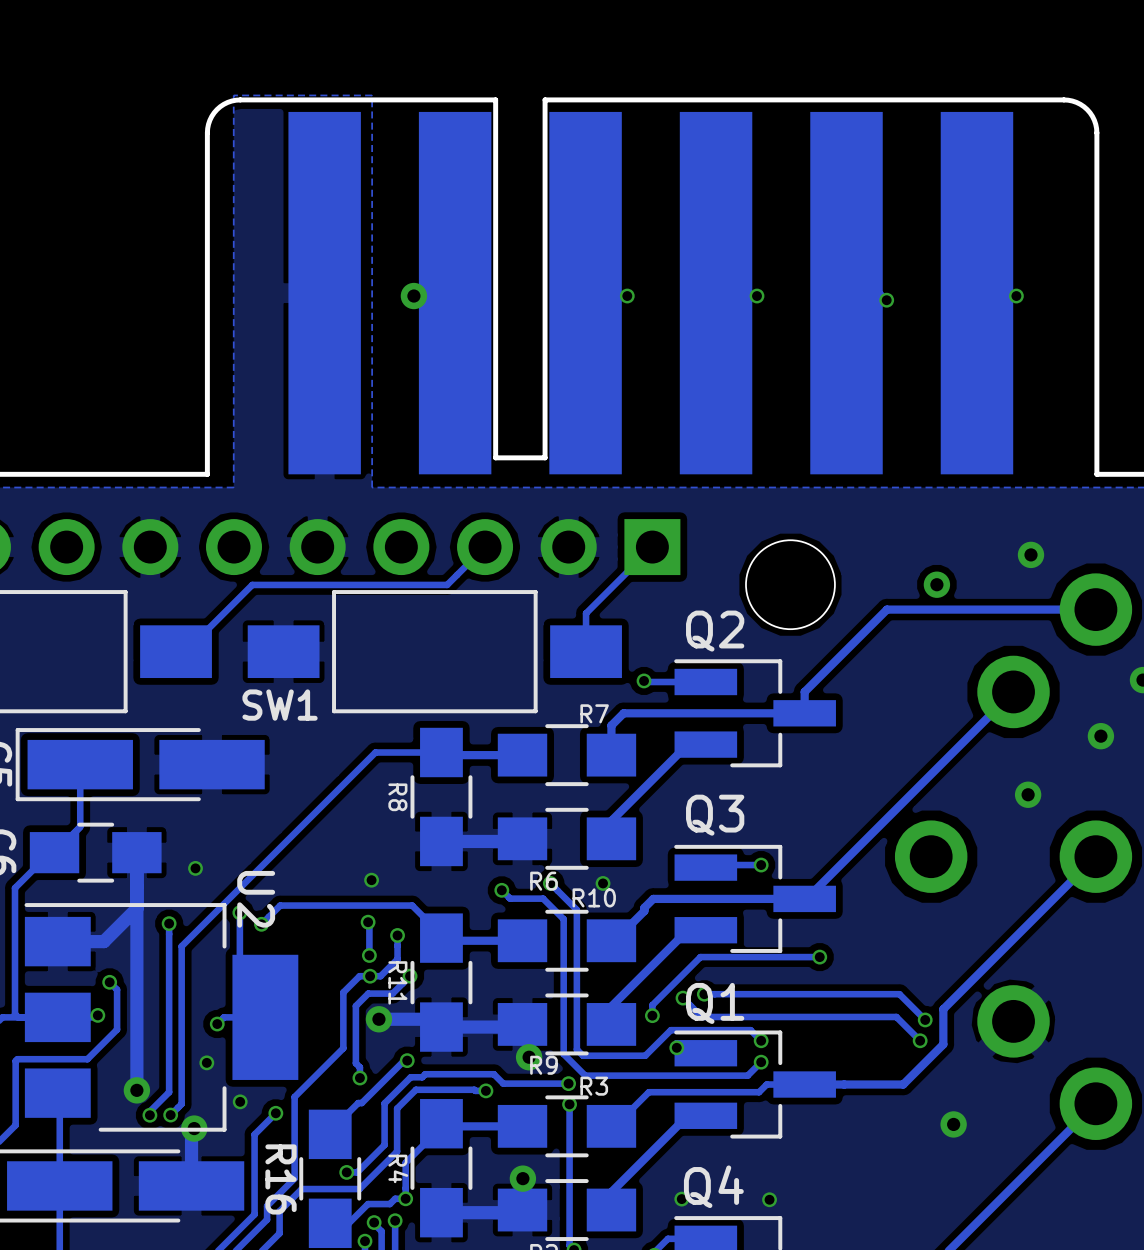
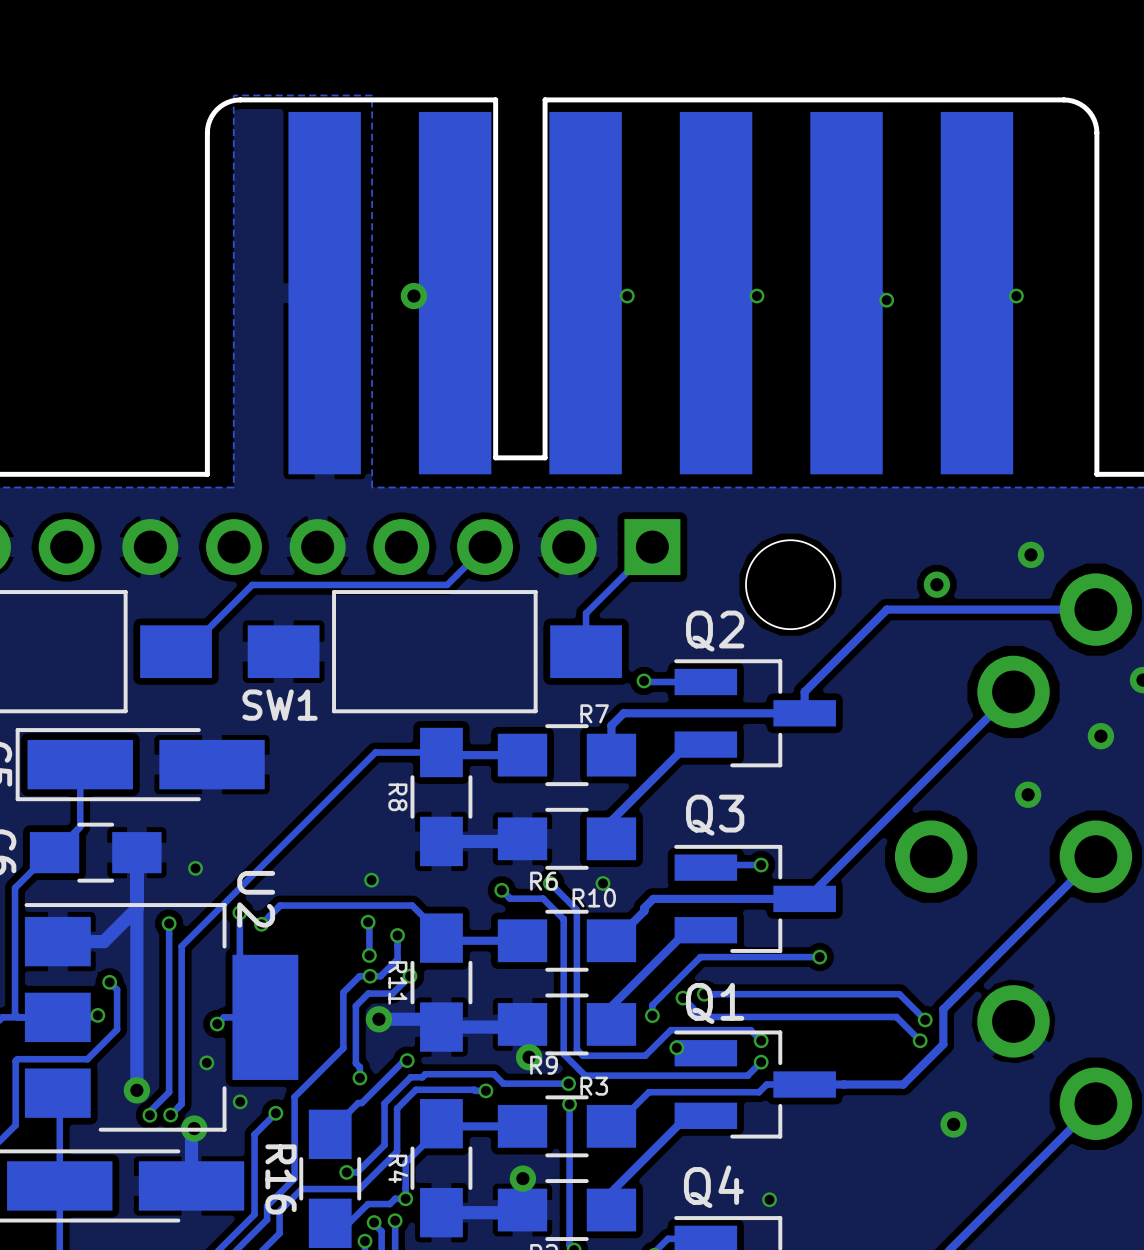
via: (681, 1199) -> none

